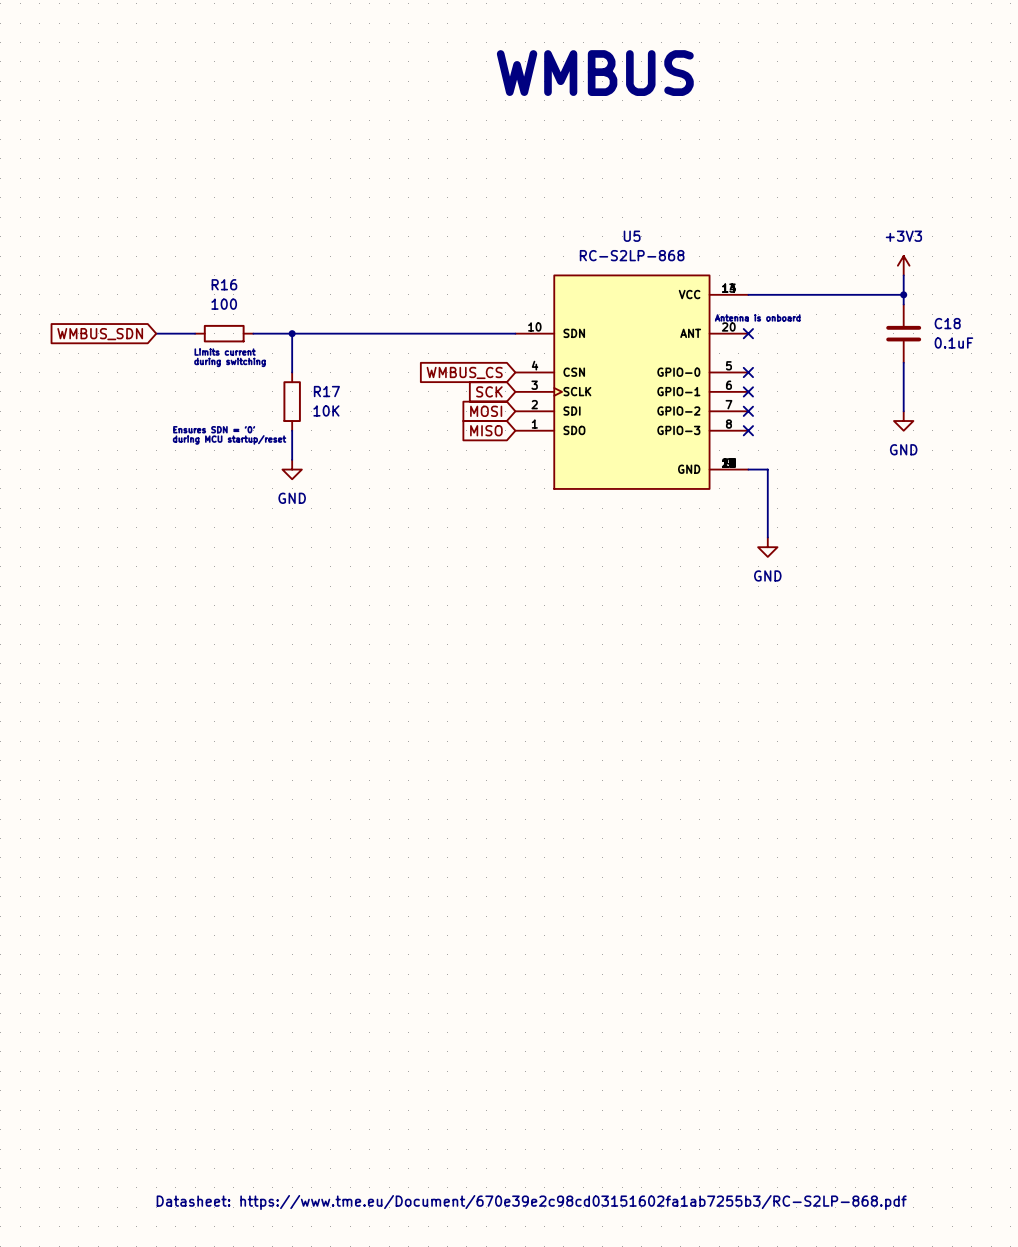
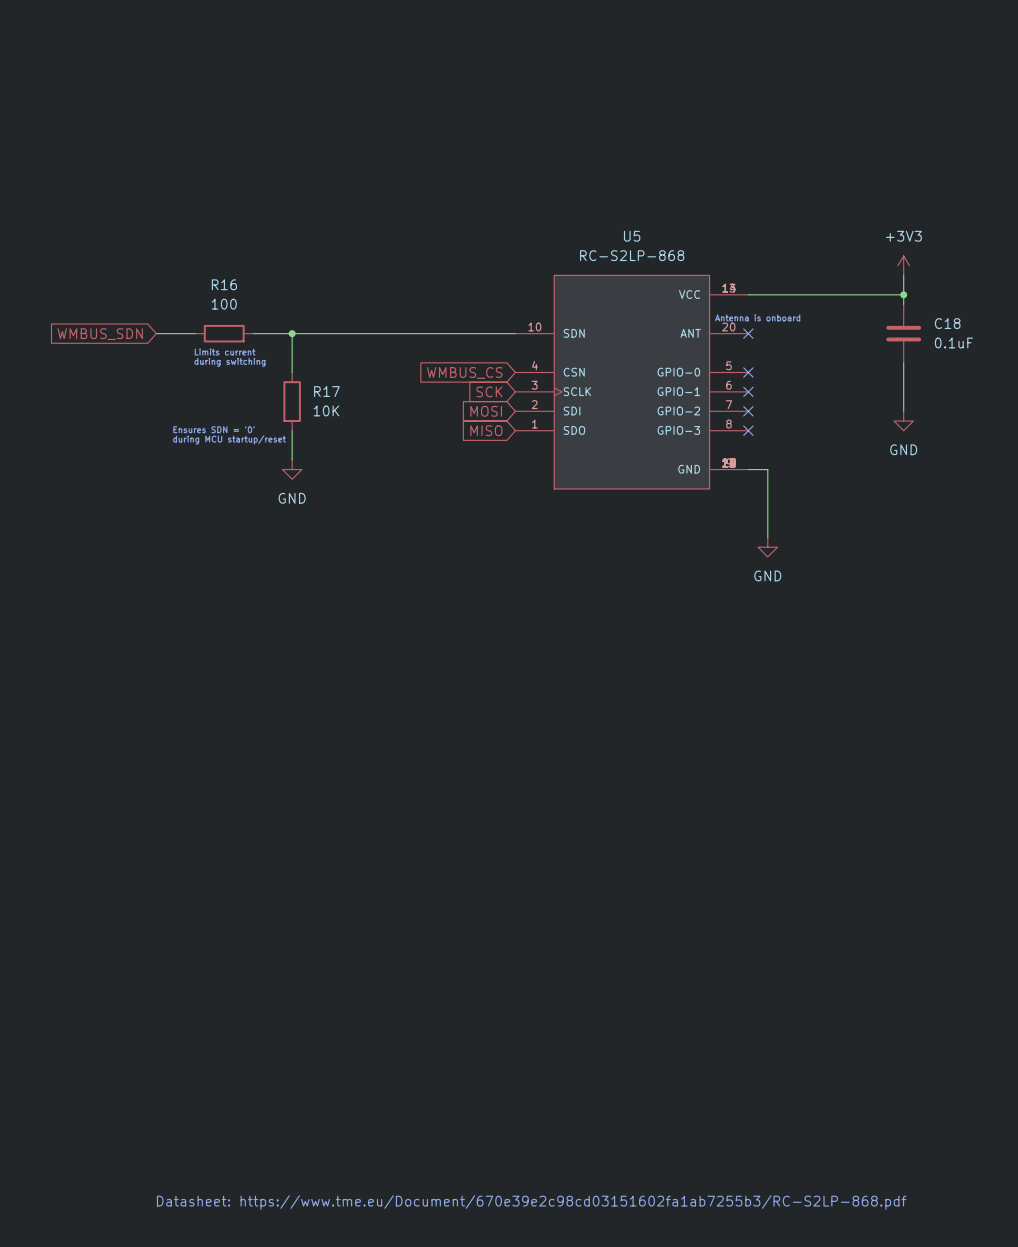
text: WMBUS (595, 73) -> none

